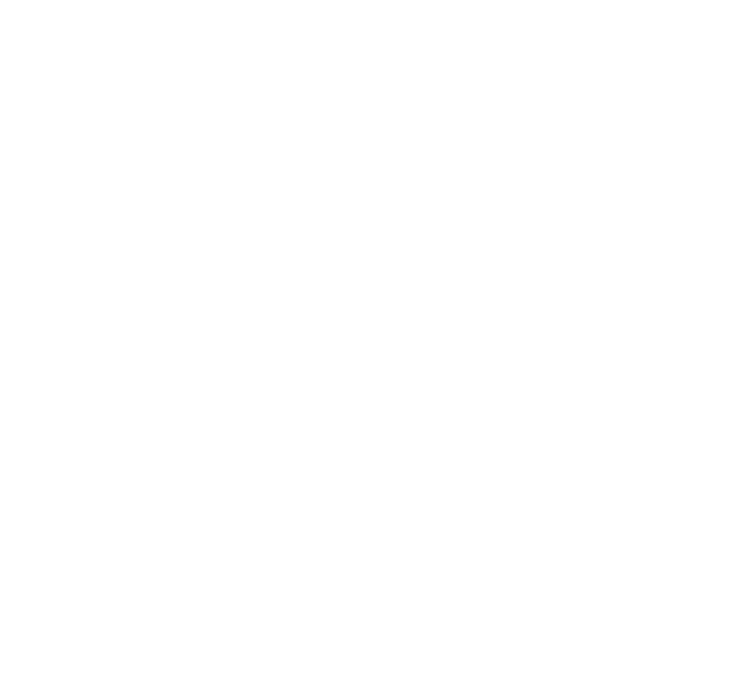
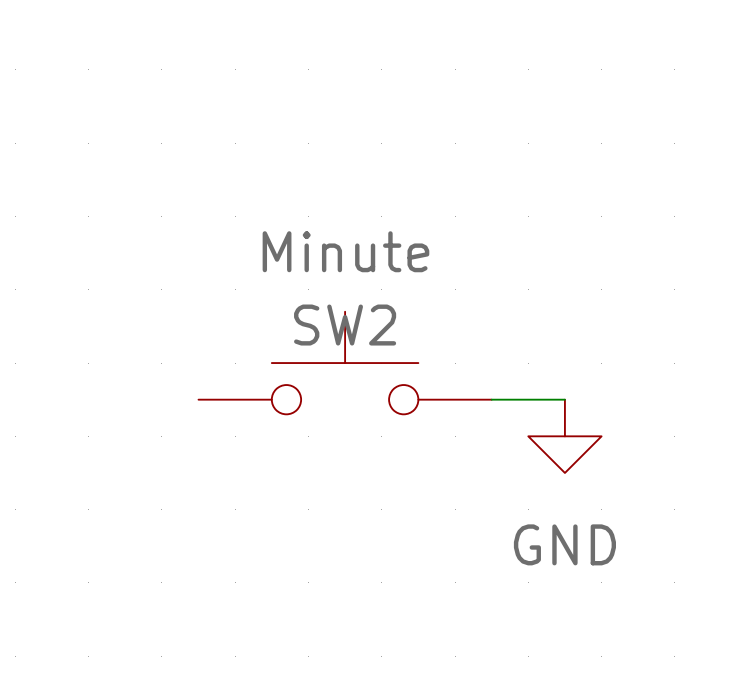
SW2: none -> Minute (345, 363)
wire: none -> (491, 399) (564, 399)
power symbol: none -> GND (564, 436)

